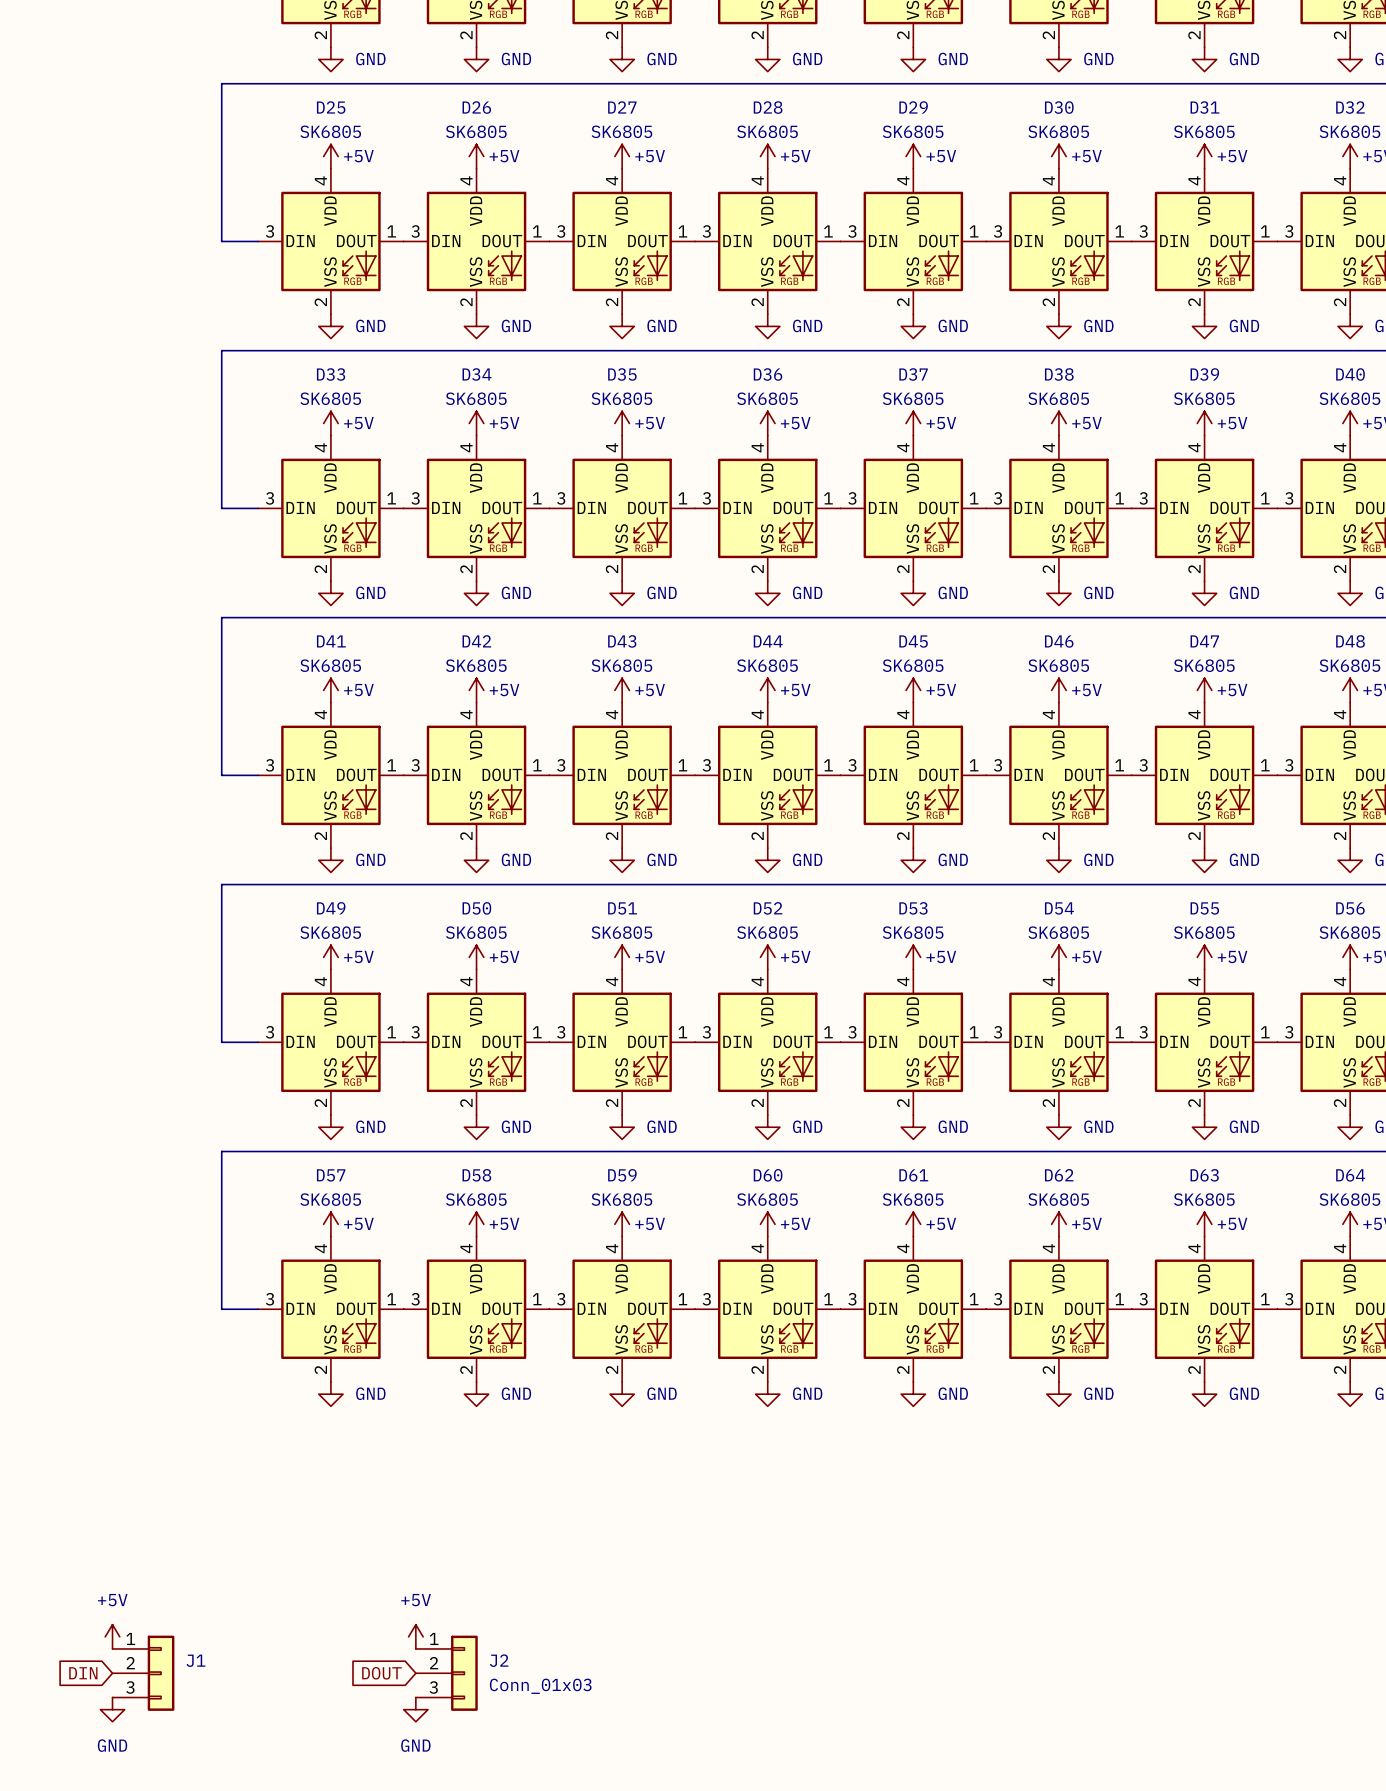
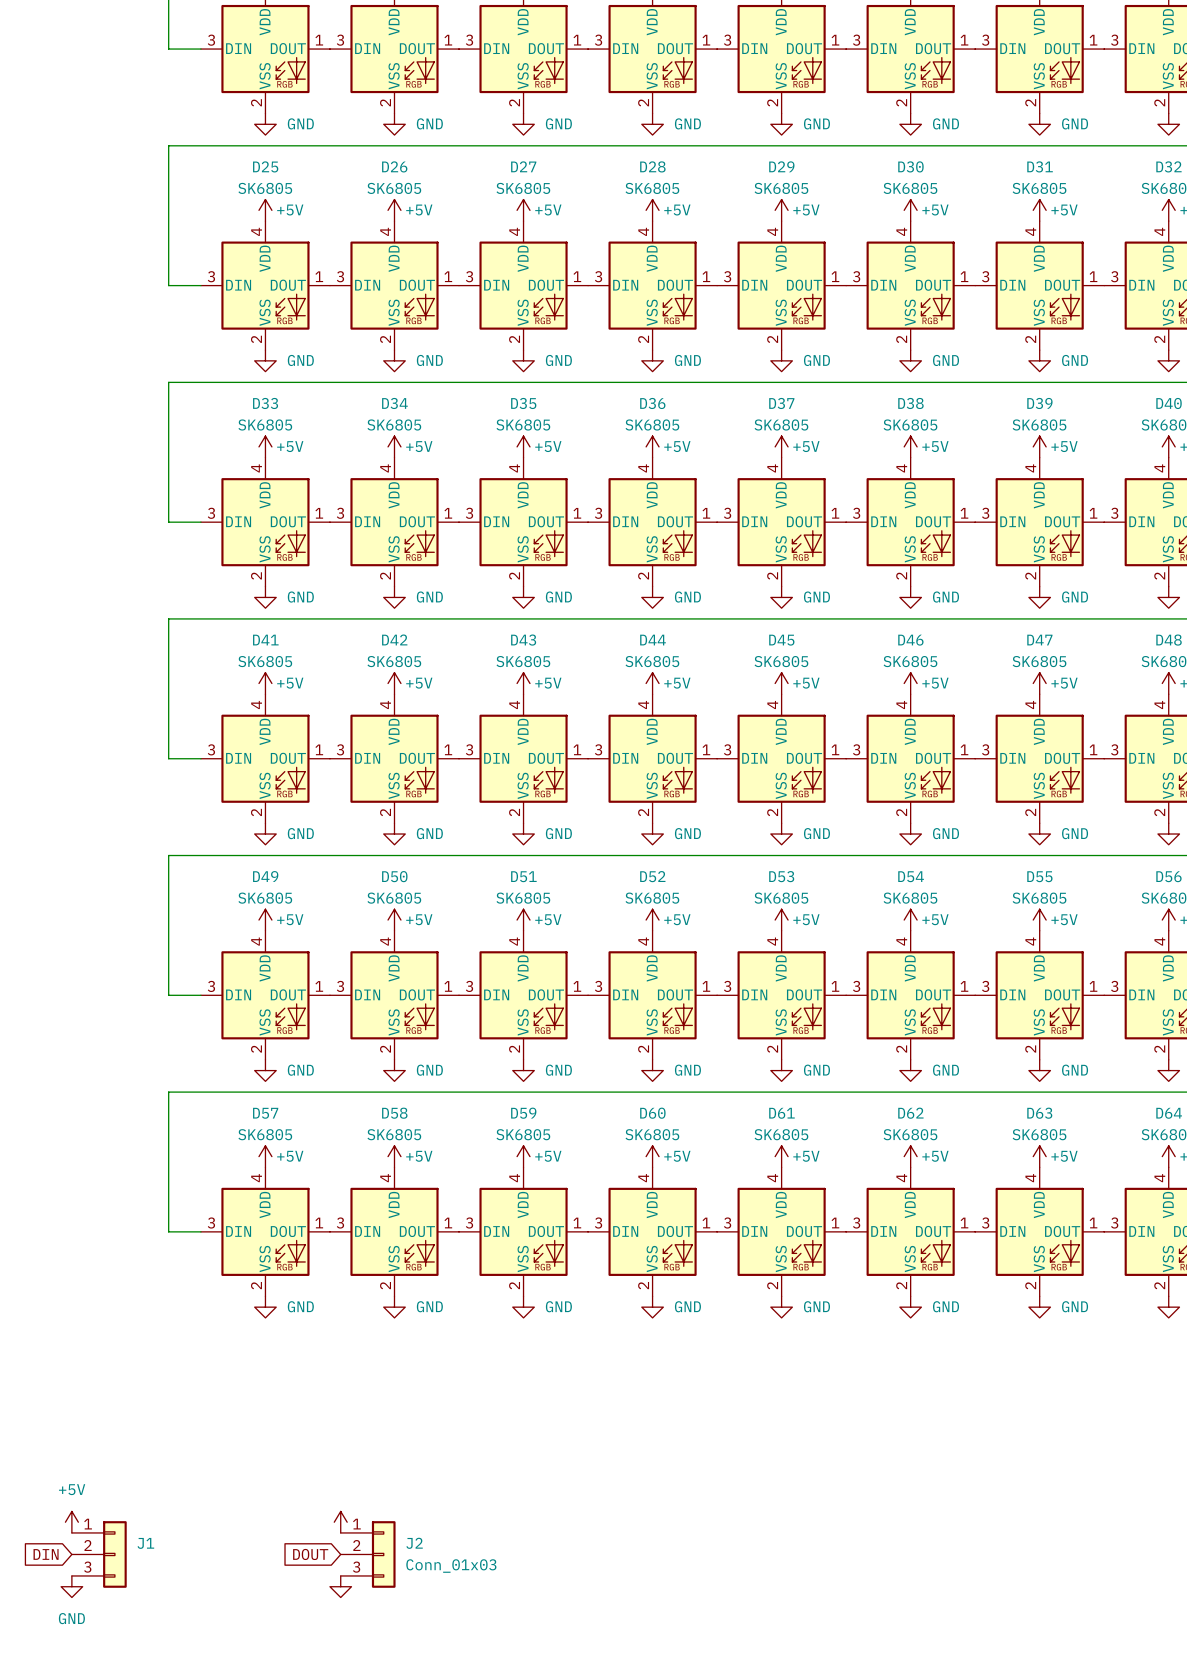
power symbol text: +5V (416, 1600) -> none
power symbol text: GND (415, 1745) -> none

